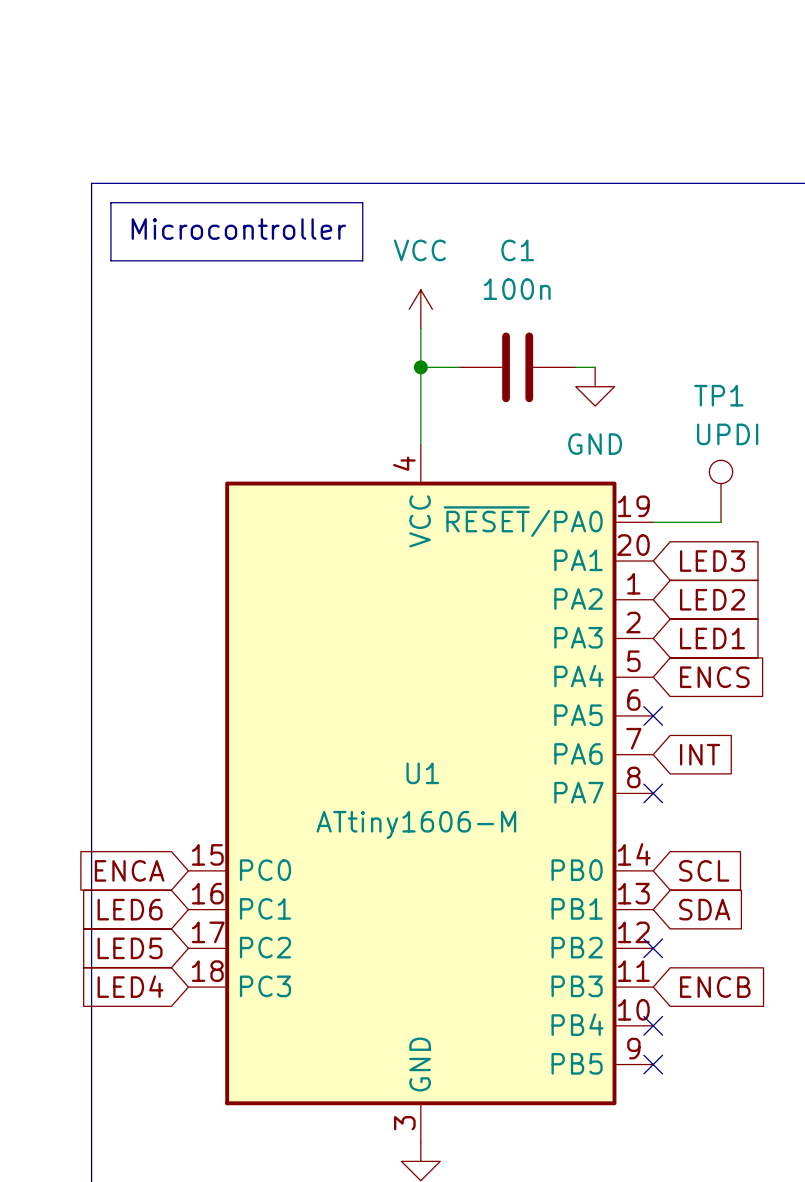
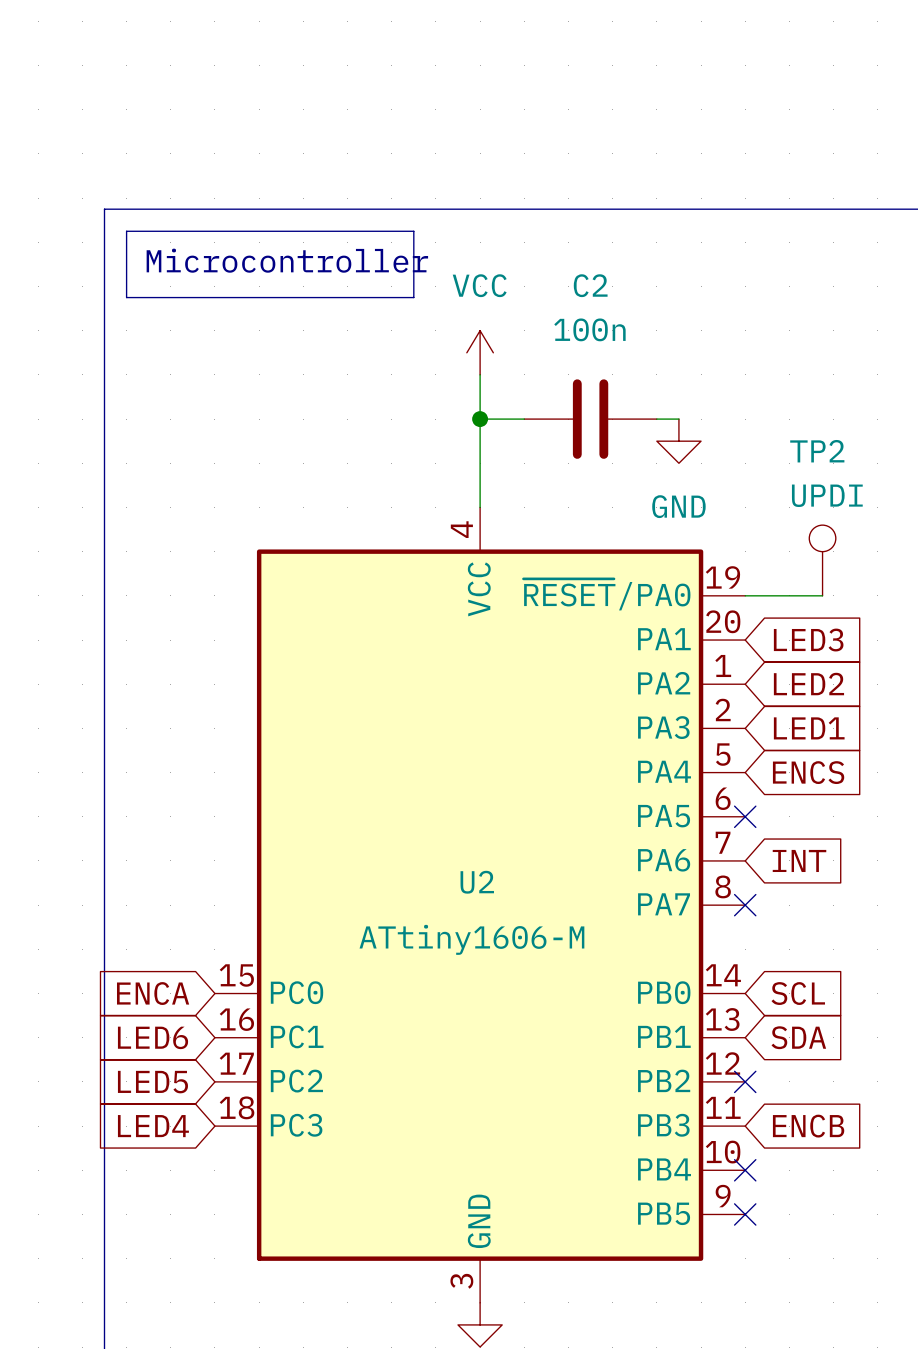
C1 name: C1 (517, 250) -> C2 (590, 285)
TP1 name: TP1 (718, 395) -> TP2 (817, 451)
U1 name: U1 (422, 773) -> U2 (477, 882)

